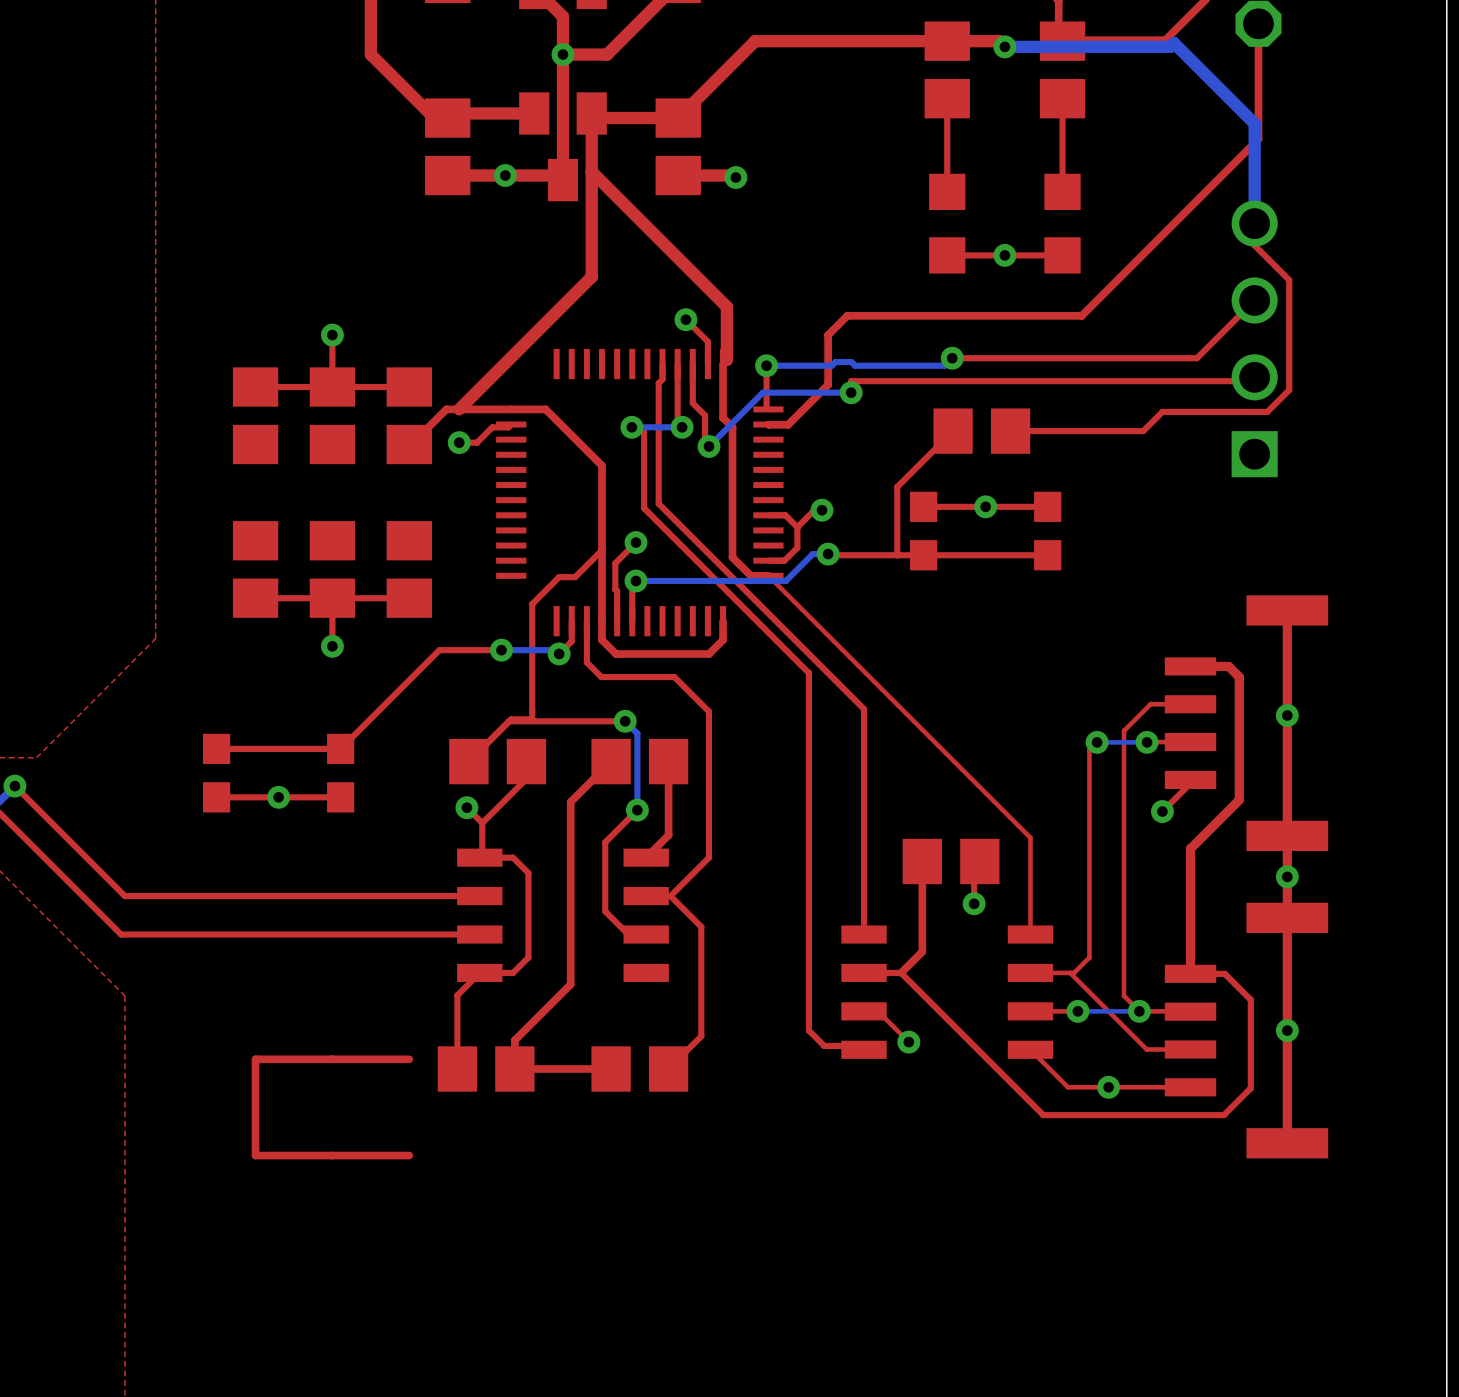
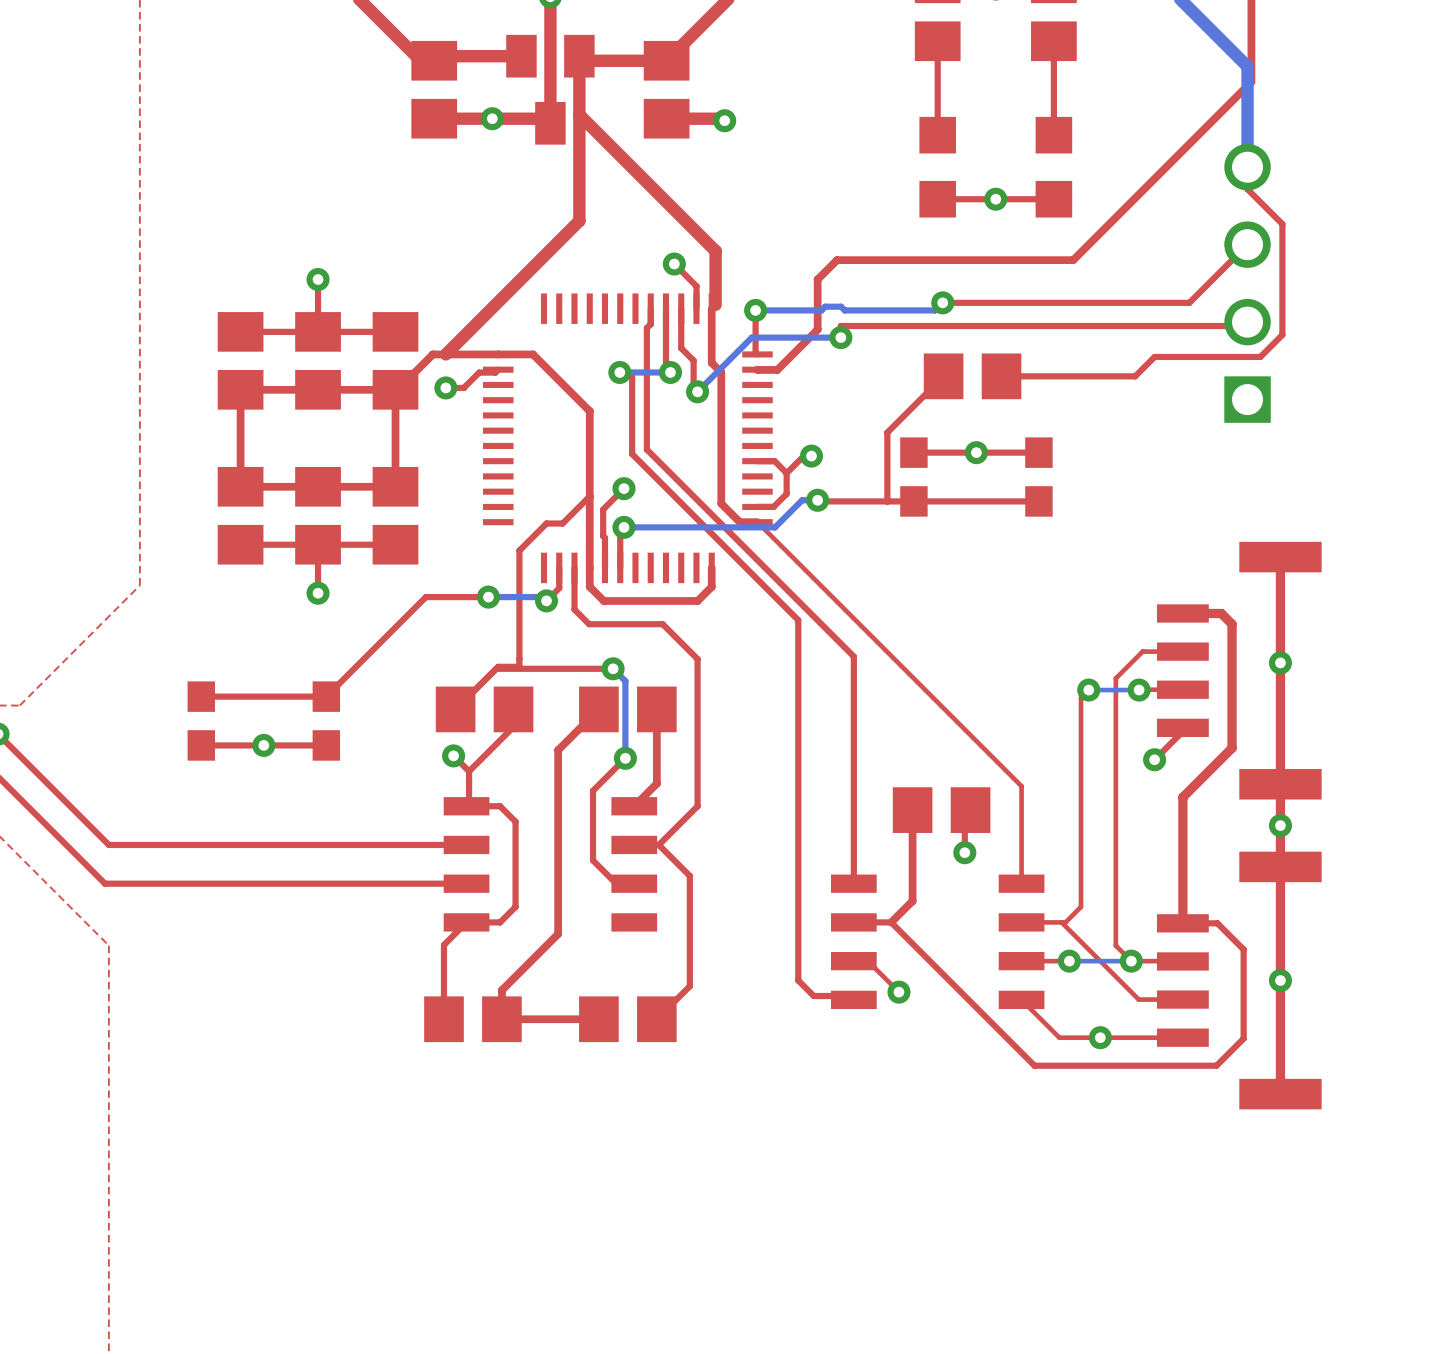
top track: none -> (395, 389) (240, 389) (240, 486) (395, 486) (395, 389)
top track: (409, 1059) (255, 1059) (255, 1155) (409, 1155) -> none

